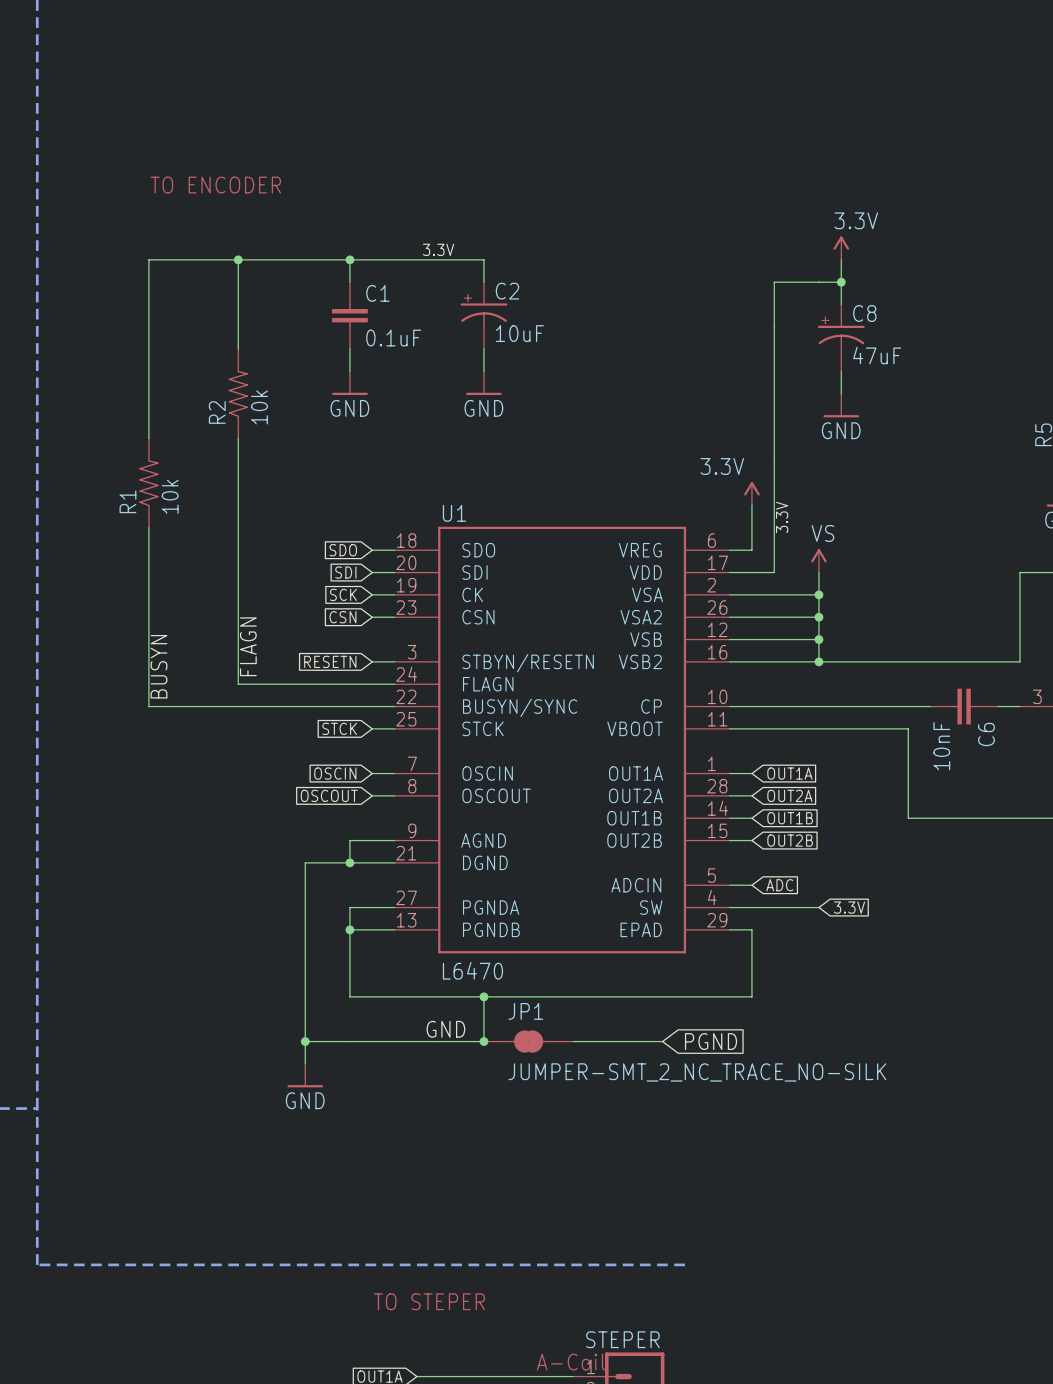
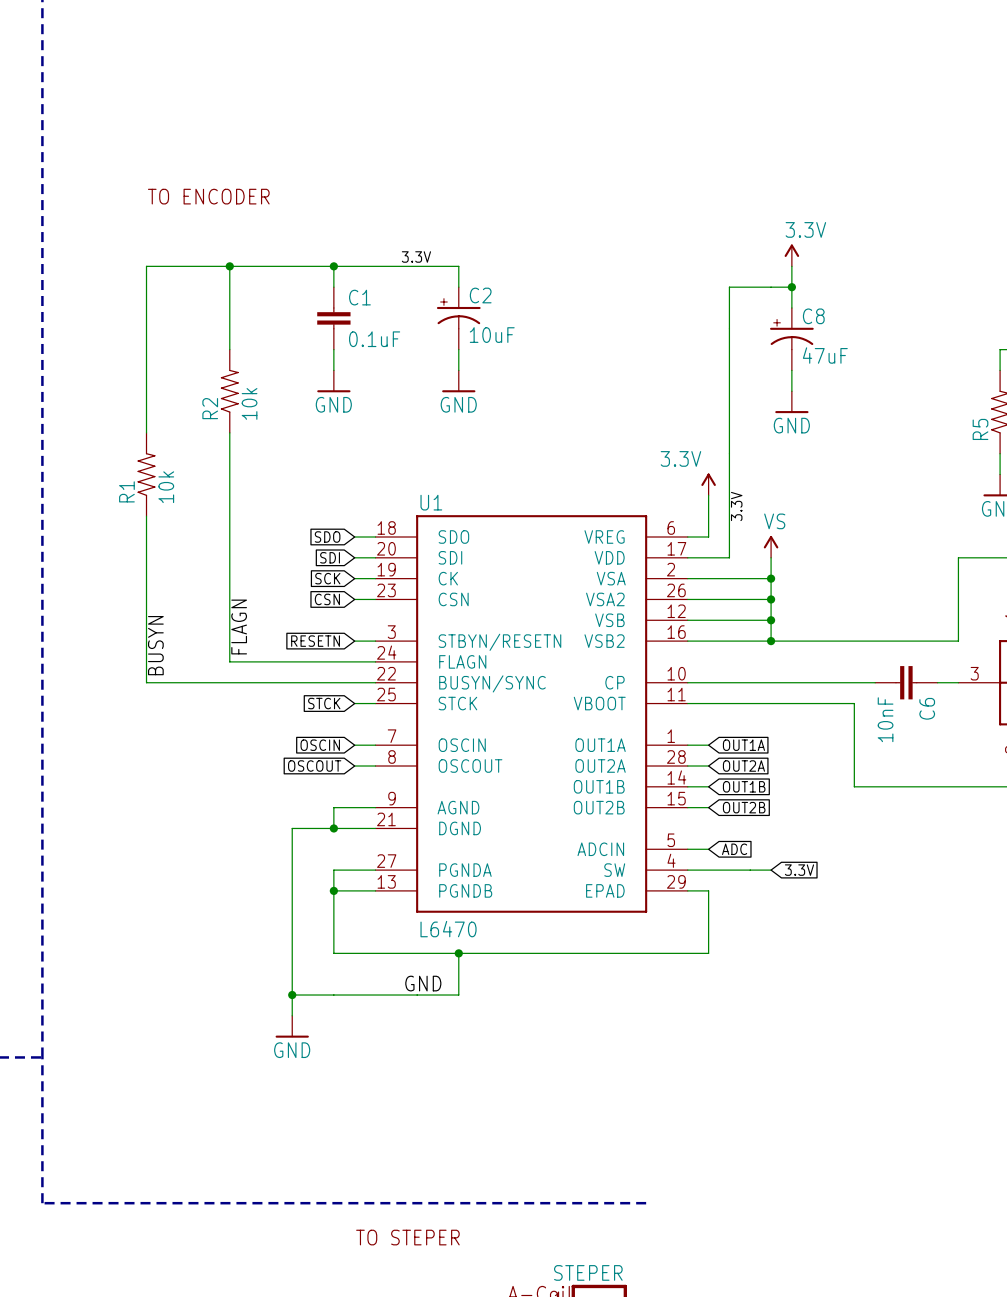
junction: (483, 1041) -> none
JP1: JUMPER-SMT_2_NC_TRACE_NO-SILK (528, 1041) -> none
wire: (573, 1041) (662, 1041) -> none
global label: PGND (711, 1041) -> none

